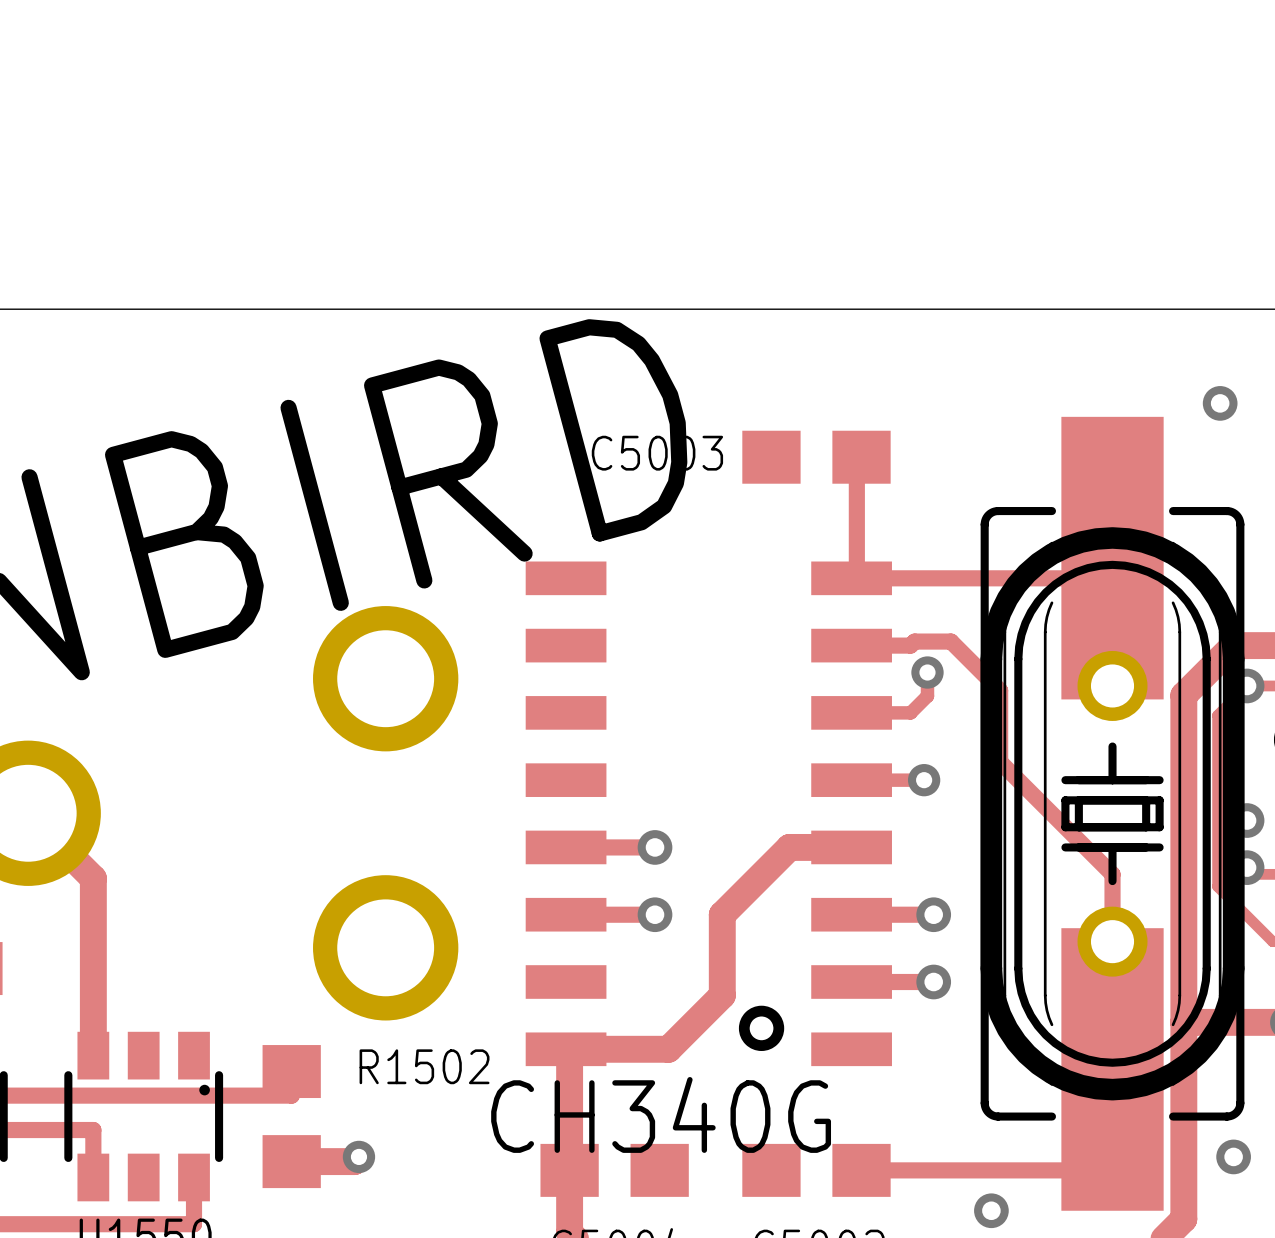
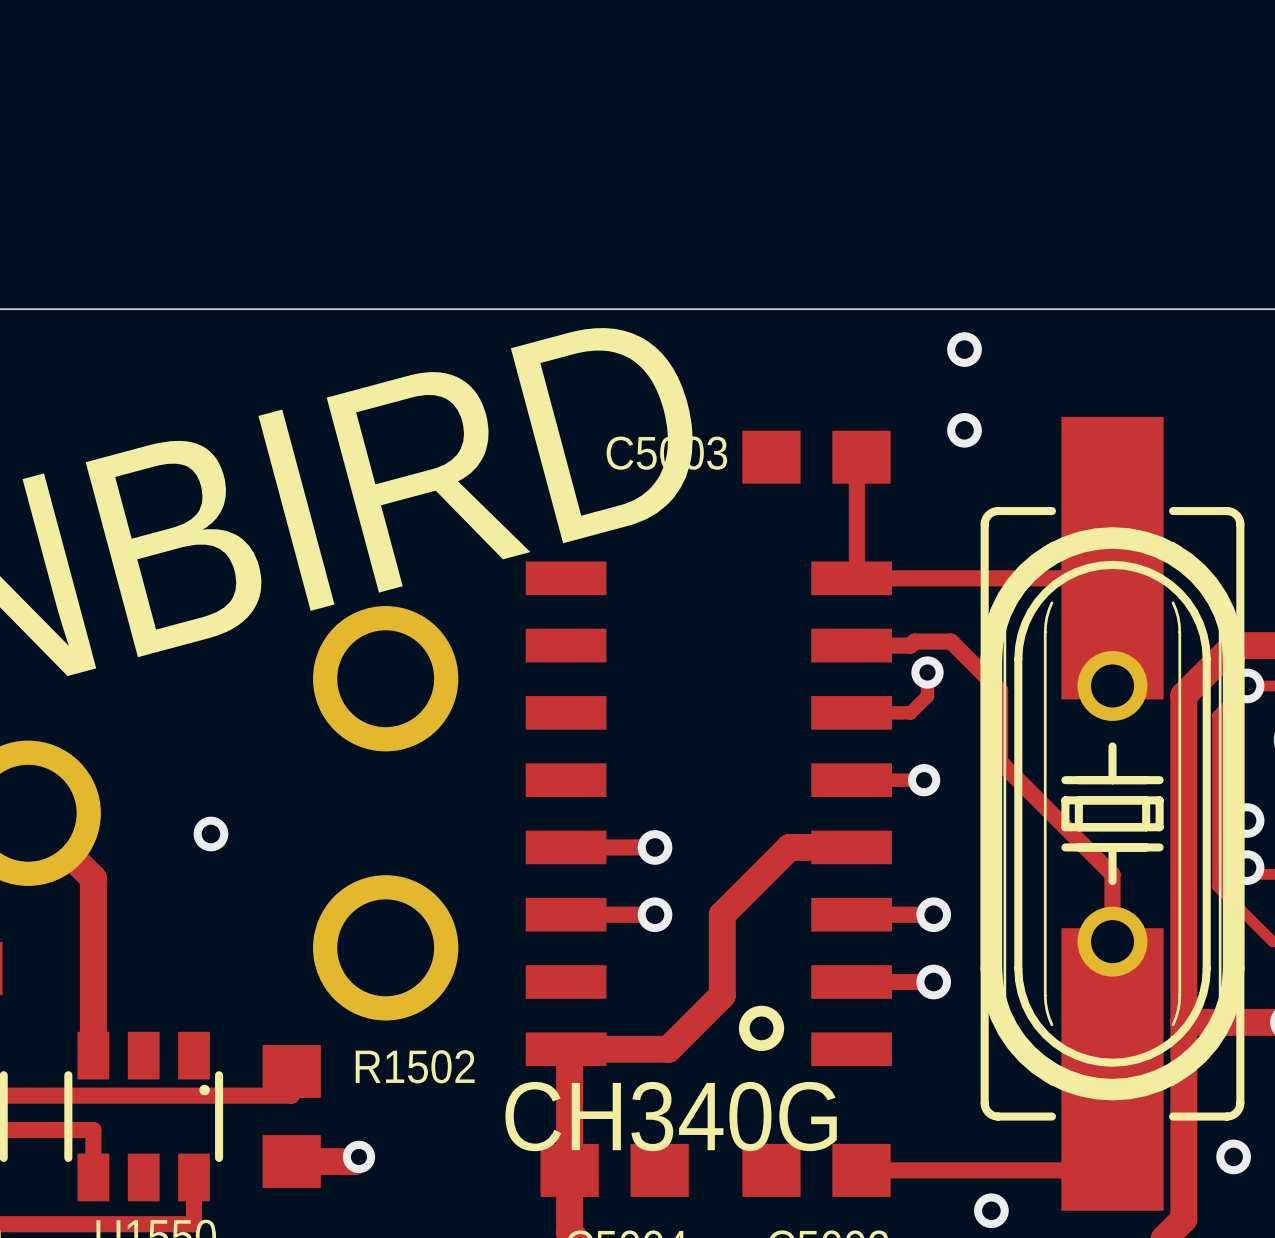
via: none -> (964, 349)
via: (1220, 403) -> none
via: none -> (964, 430)
via: none -> (210, 833)

